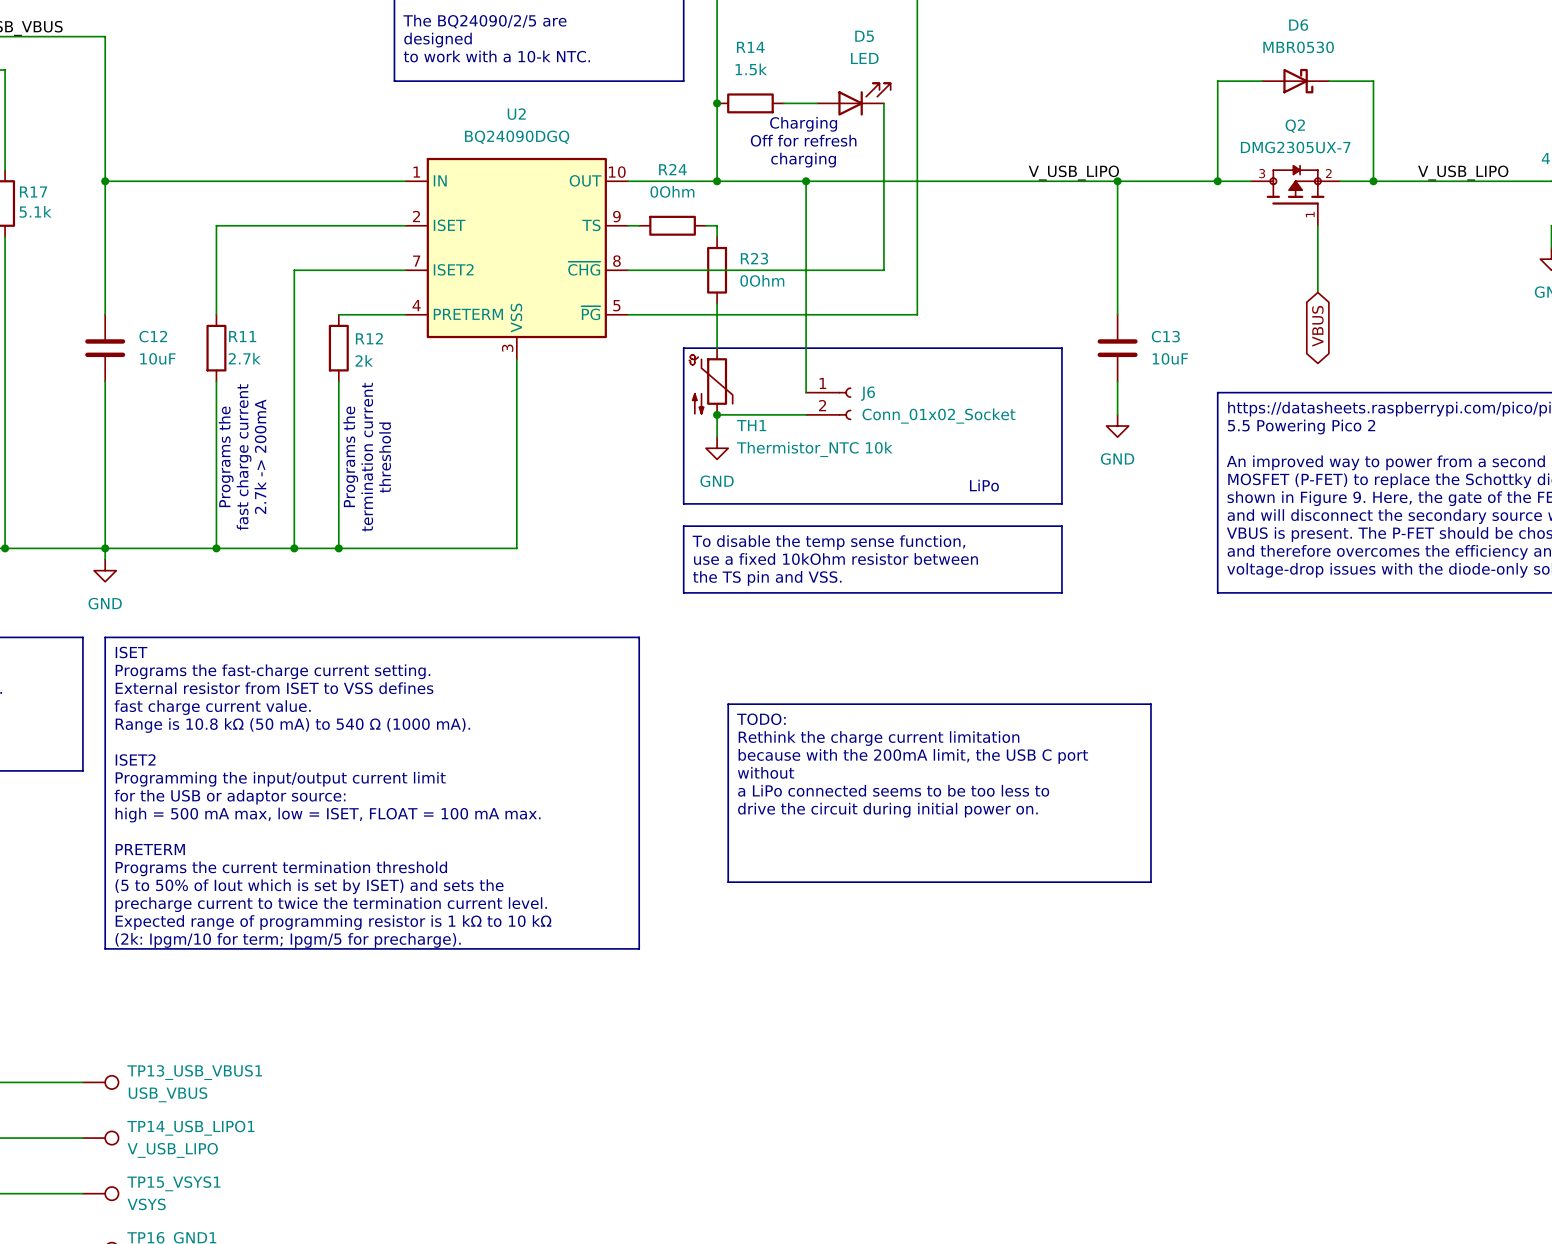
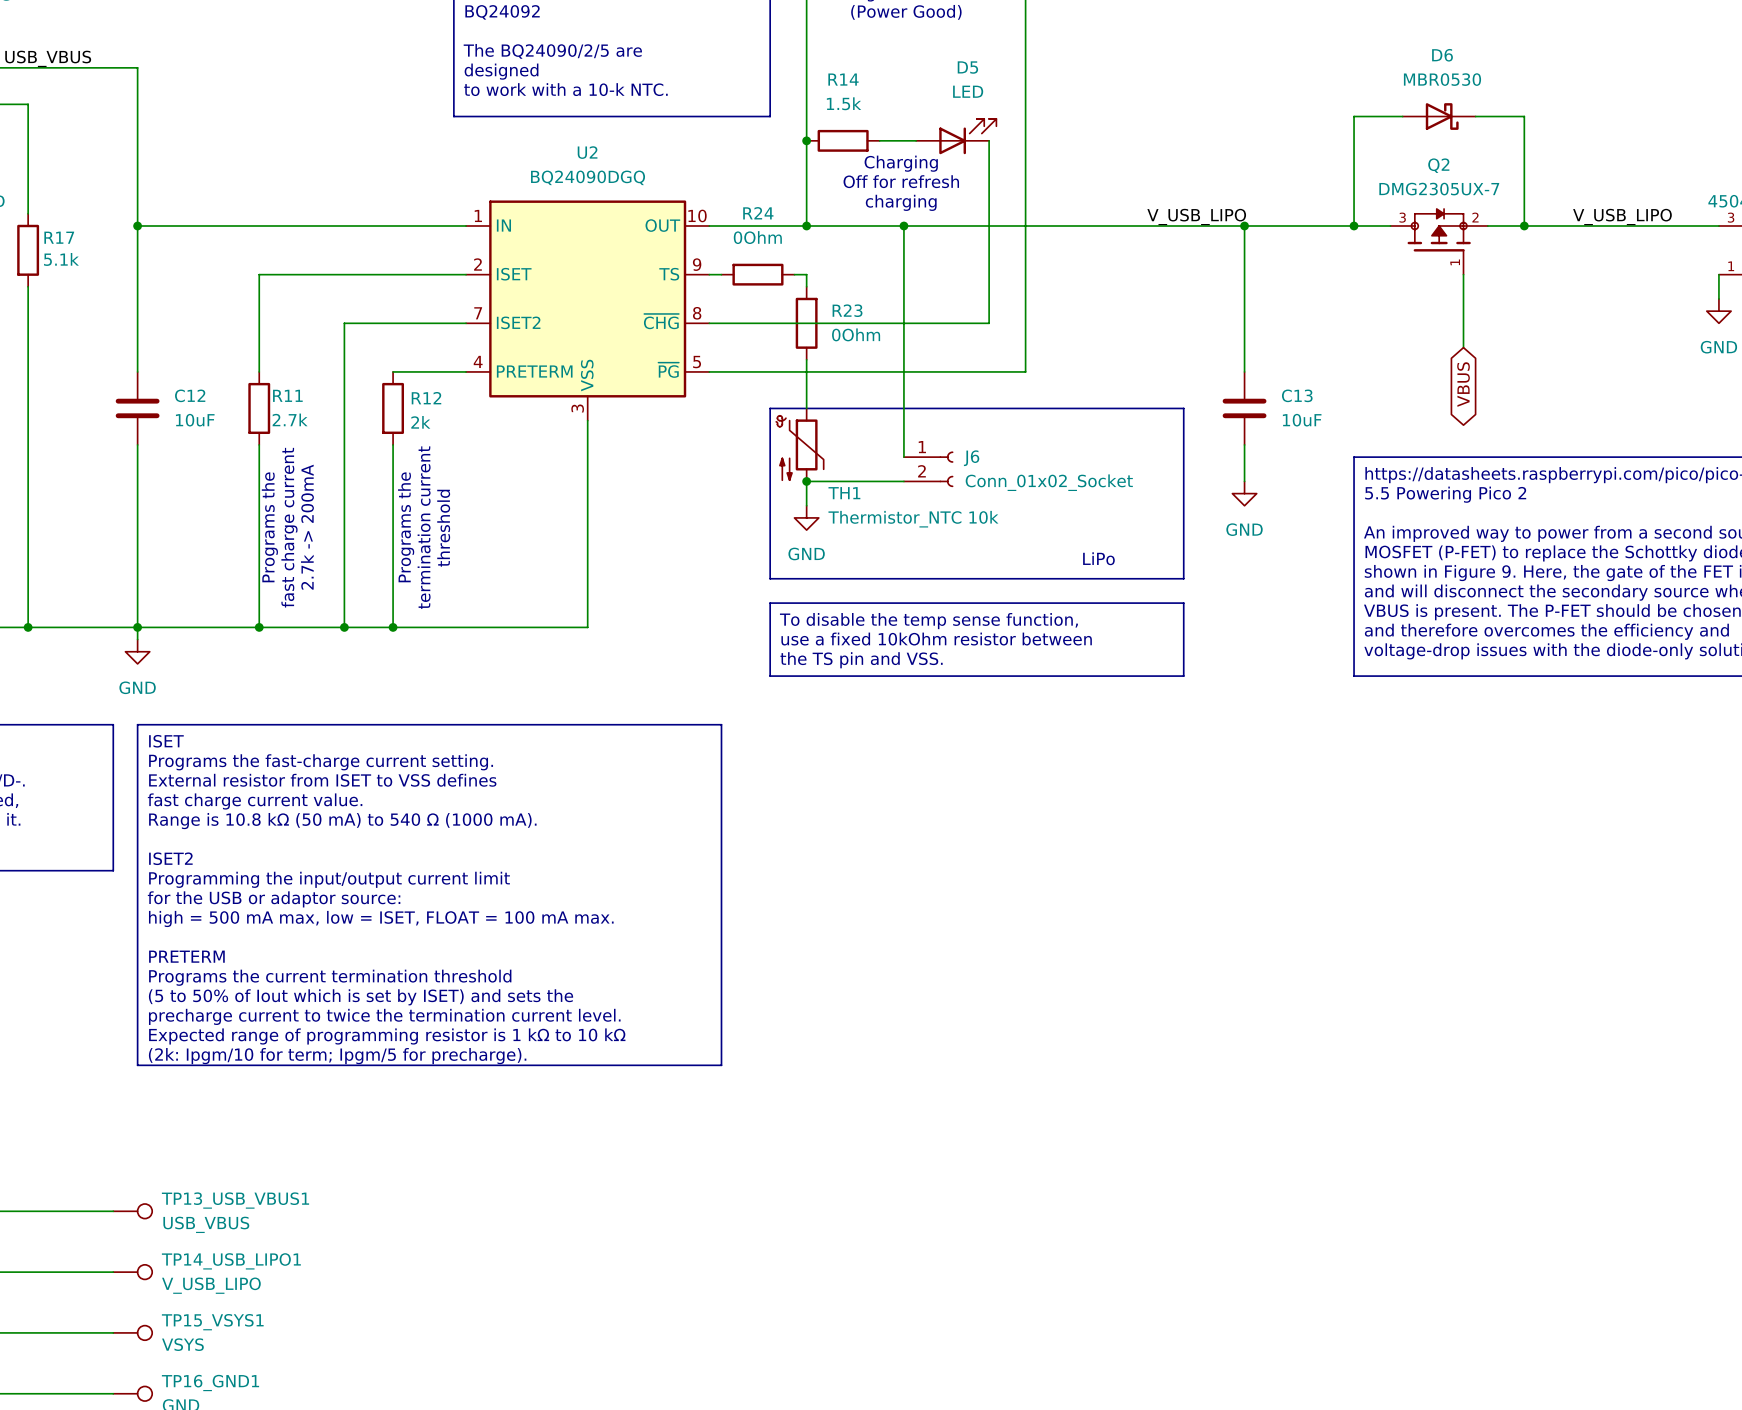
line: (728, 704) (1150, 704) (1150, 882) (728, 882) (728, 704) -> none
text: TODO: (761, 719) -> none
text: Rethink the charge current limitation (879, 738) -> none
text: because with the 200mA limit, the USB C port (913, 756) -> none
text: without (766, 772) -> none
text: a LiPo connected seems to be too less to (893, 790) -> none
text: drive the circuit during initial power on. (887, 810) -> none

